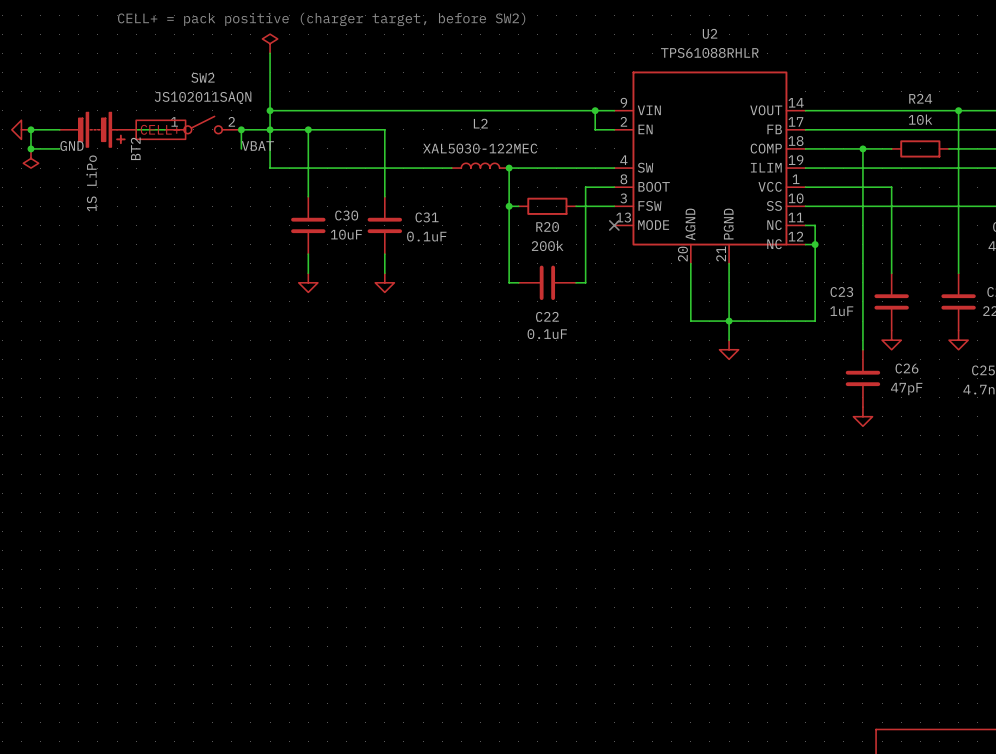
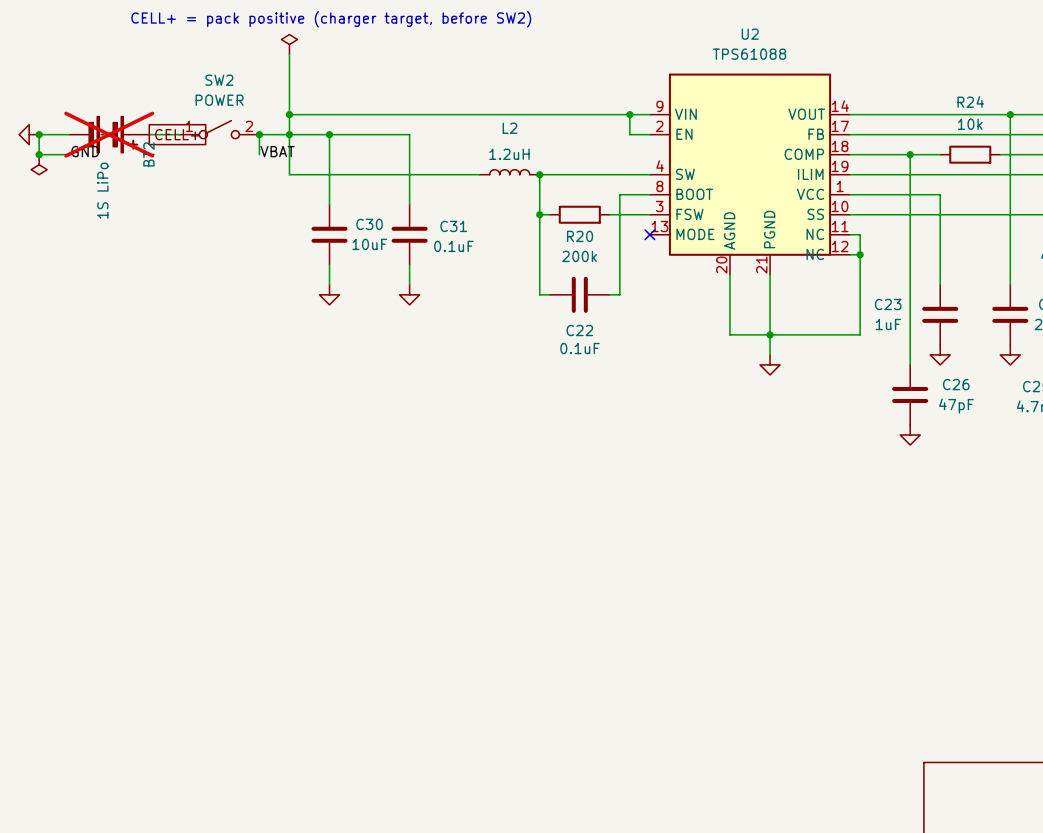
U2 value: TPS61088RHLR (709, 52) -> TPS61088 (749, 54)
SW2 value: JS102011SAQN (203, 97) -> POWER (219, 100)
BT2 do-not-place cross: none -> (109, 134)
L2 value: XAL5030-122MEC (480, 148) -> 1.2uH (509, 154)

